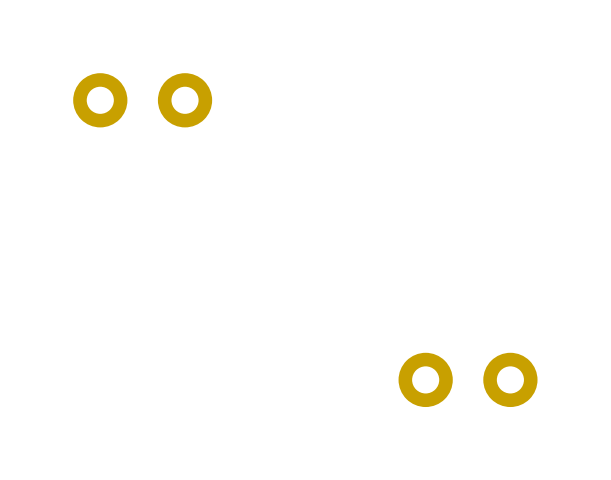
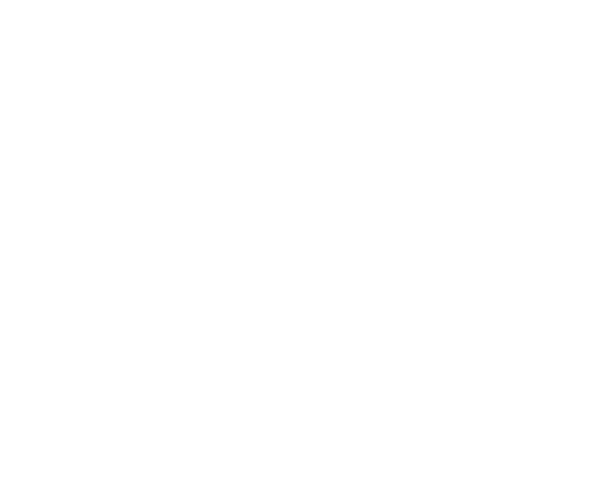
part: (142, 100) -> none
part: (468, 379) -> none

